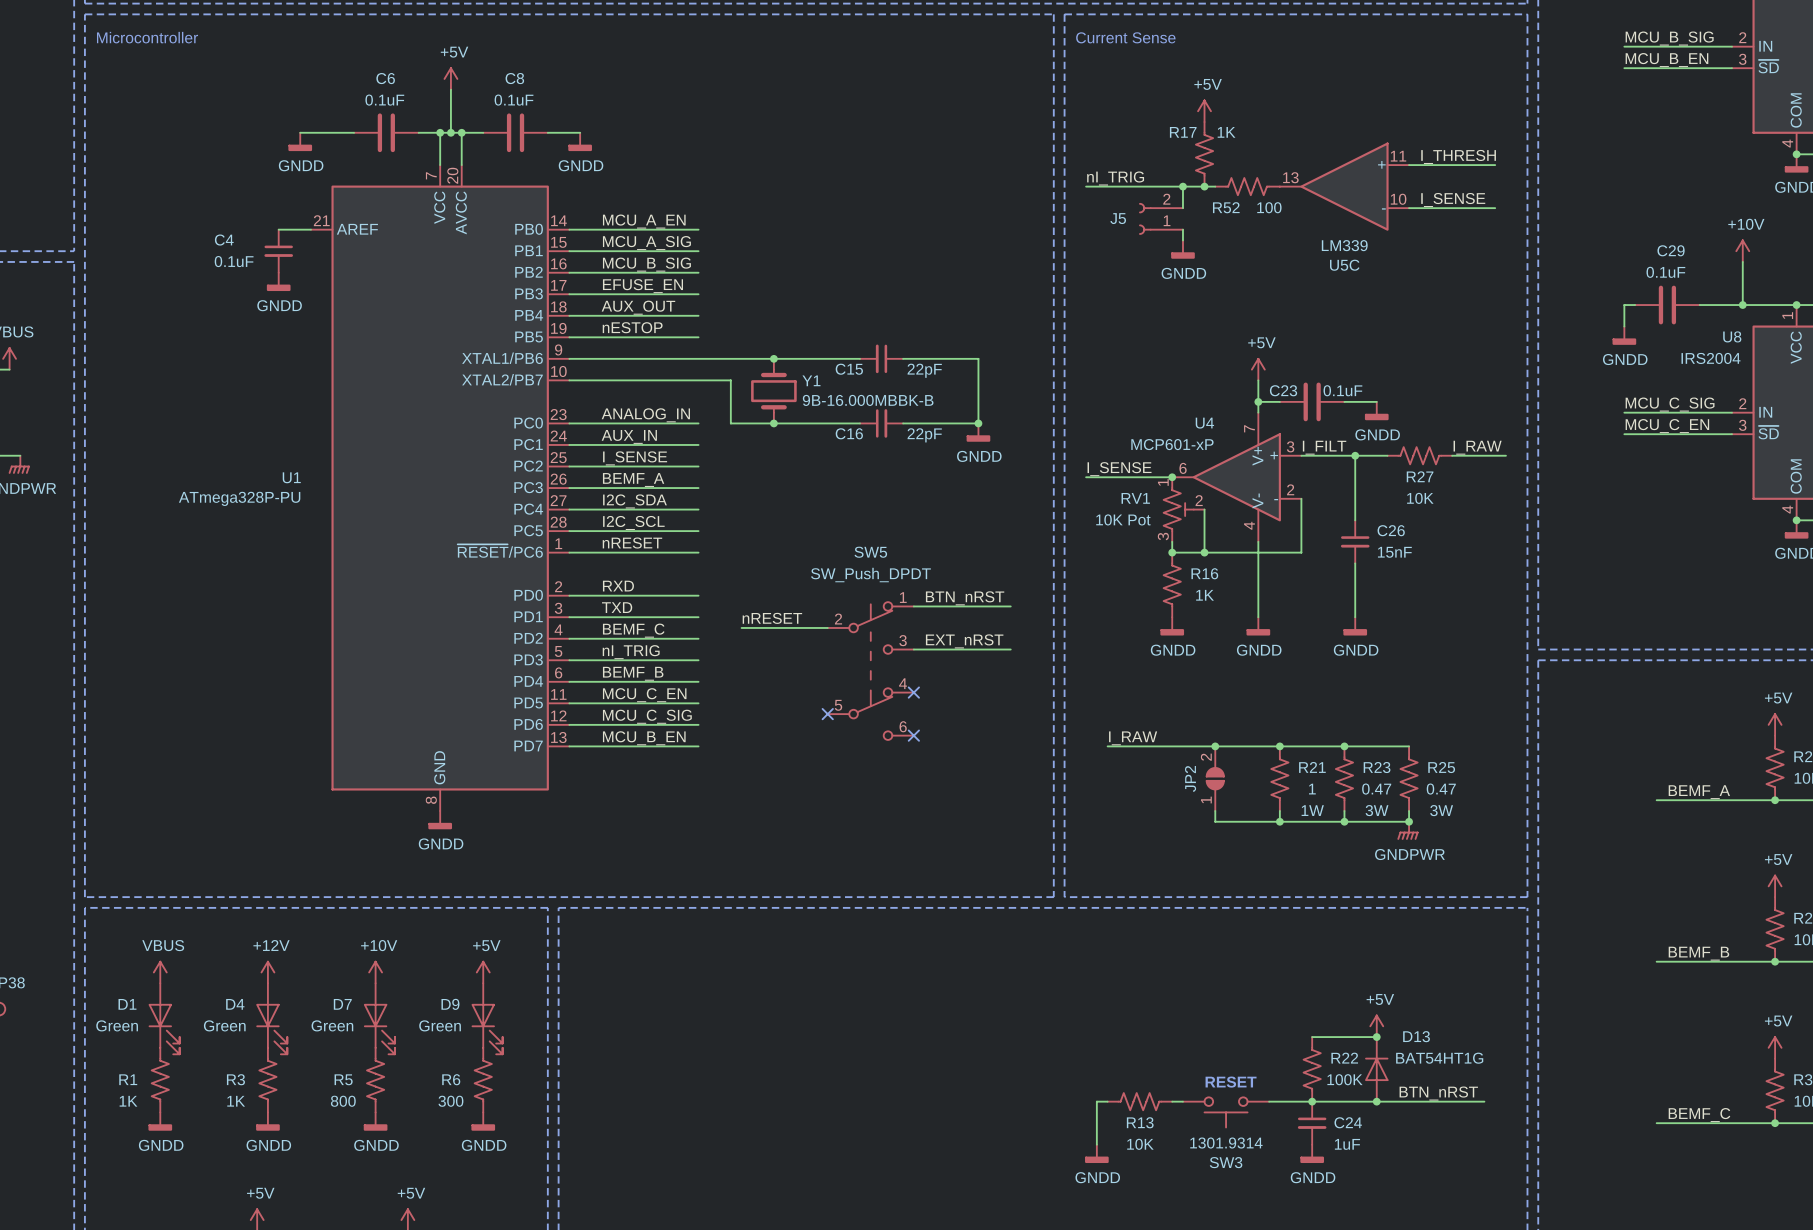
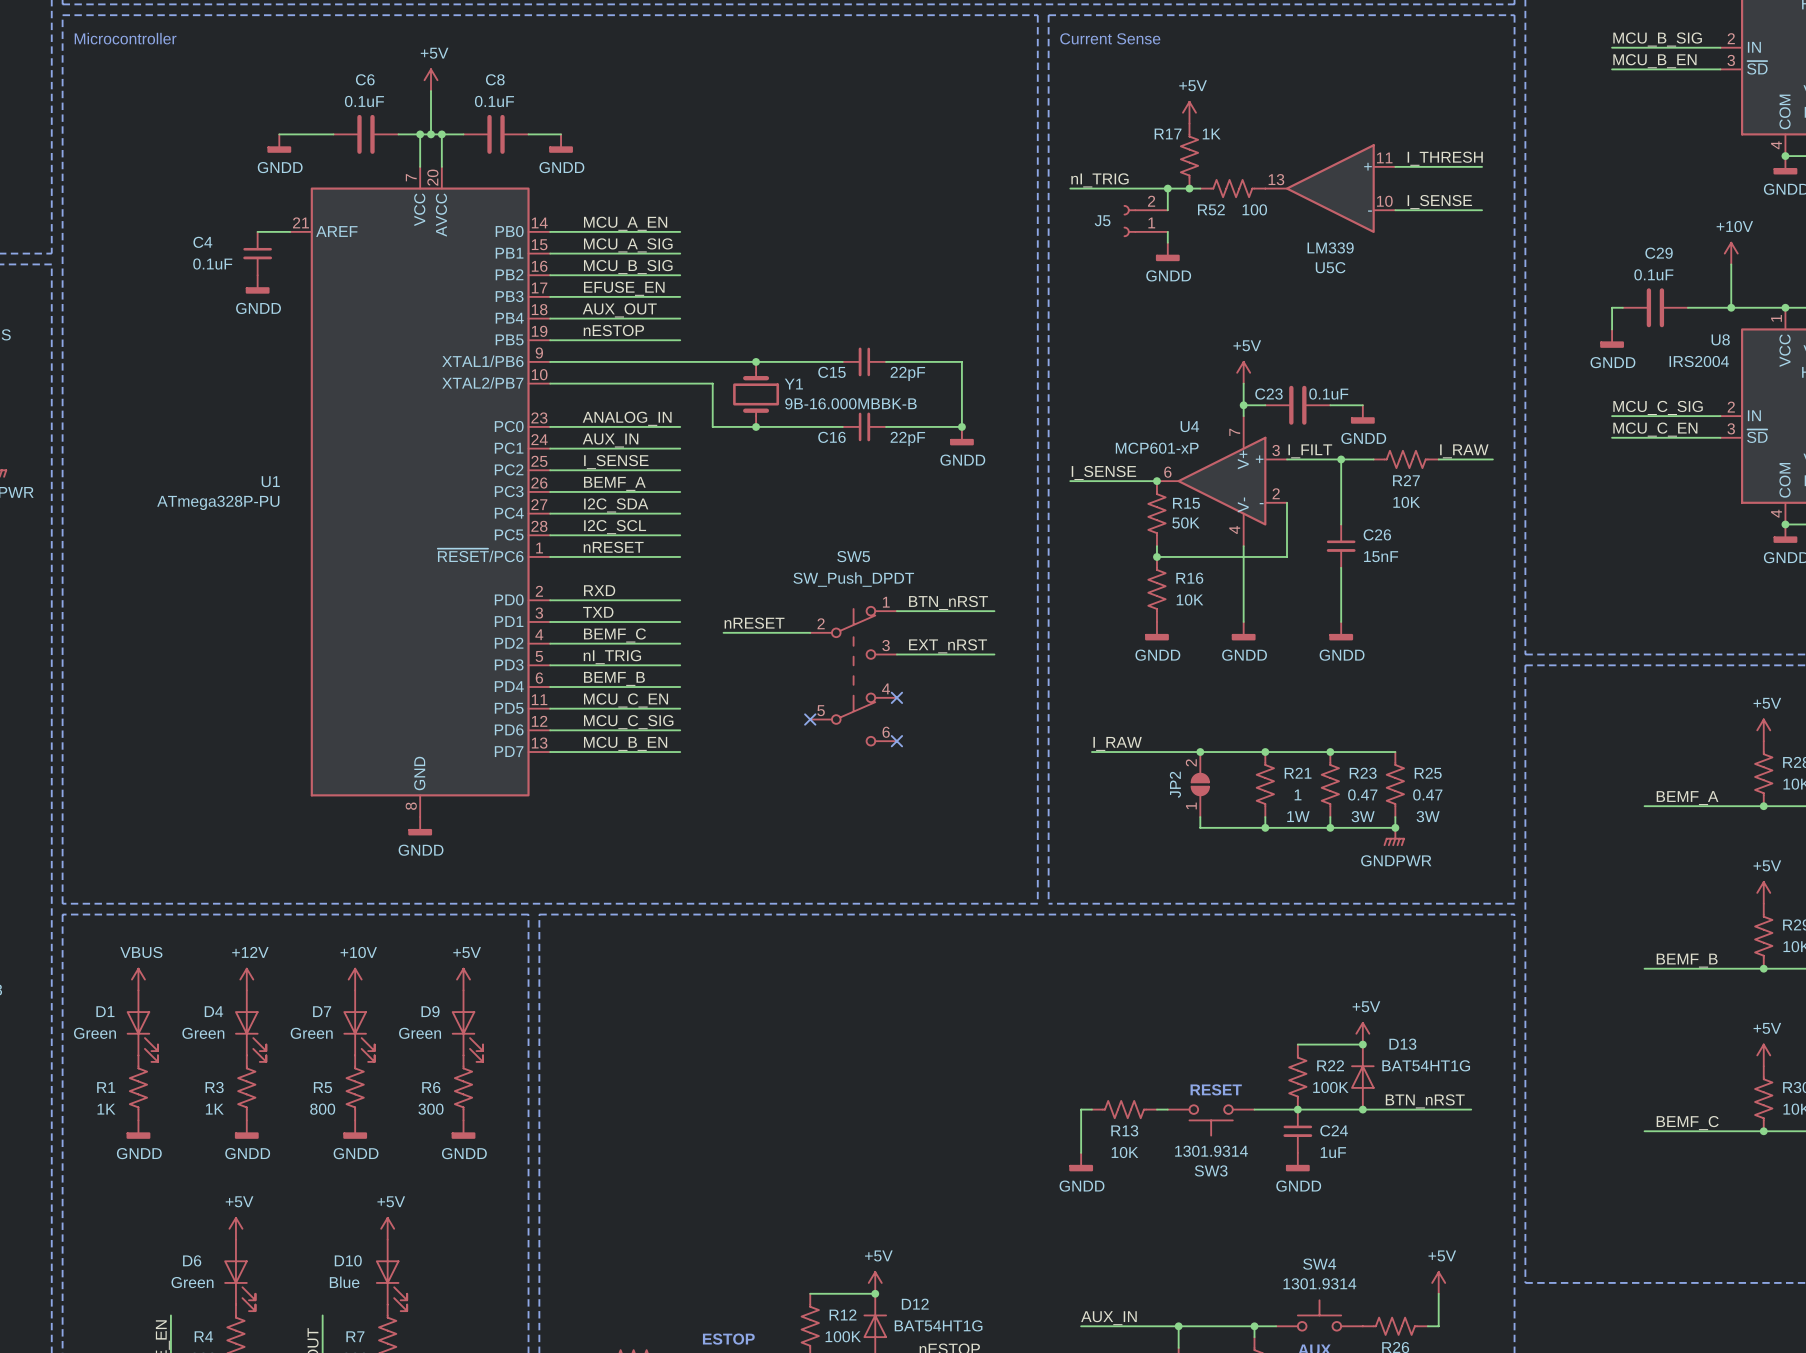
R15: none -> 50K (1156, 513)
RV1: 10K Pot (1184, 509) -> none
wire: (1204, 509) (1204, 552) -> none
junction: (1204, 552) -> none
R16 value: 1K (1205, 595) -> 10K (1189, 599)

